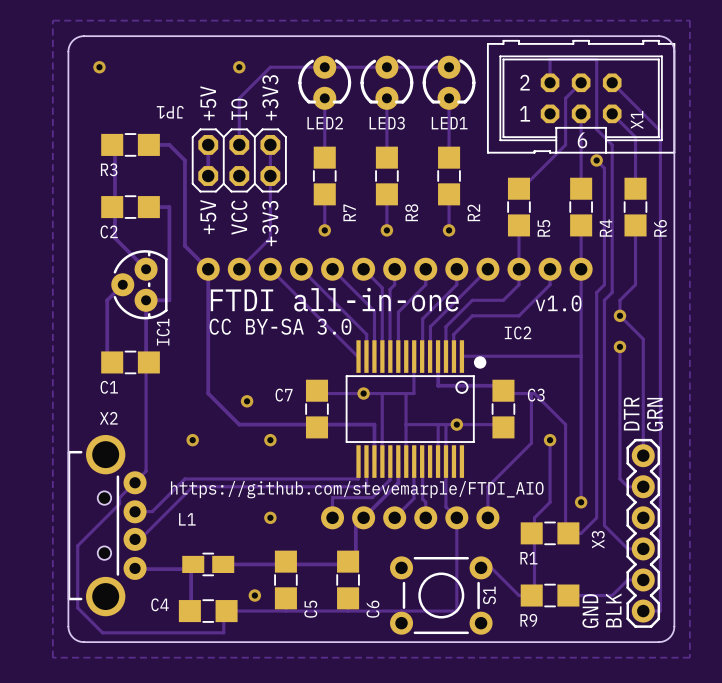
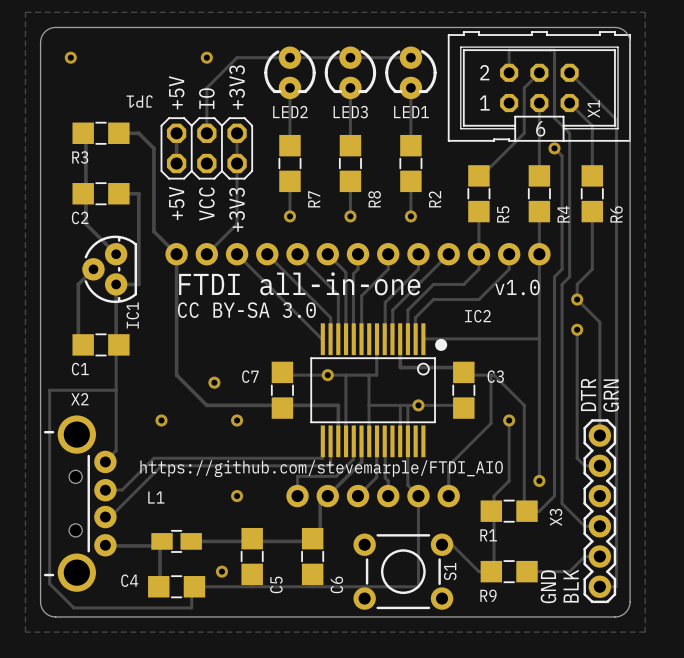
X2 footprint: [67, 434, 147, 617] -> [43, 415, 117, 592]
track: (135, 482) (119, 497) (119, 503) (77, 545) -> (116, 390) (49, 390) (49, 523)

